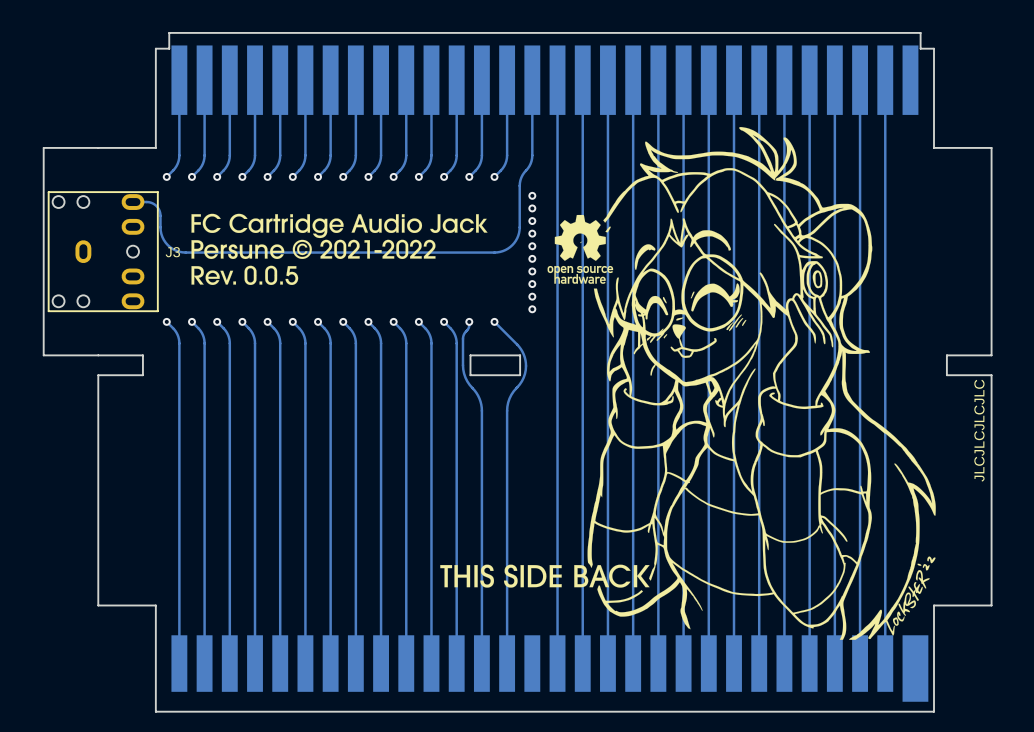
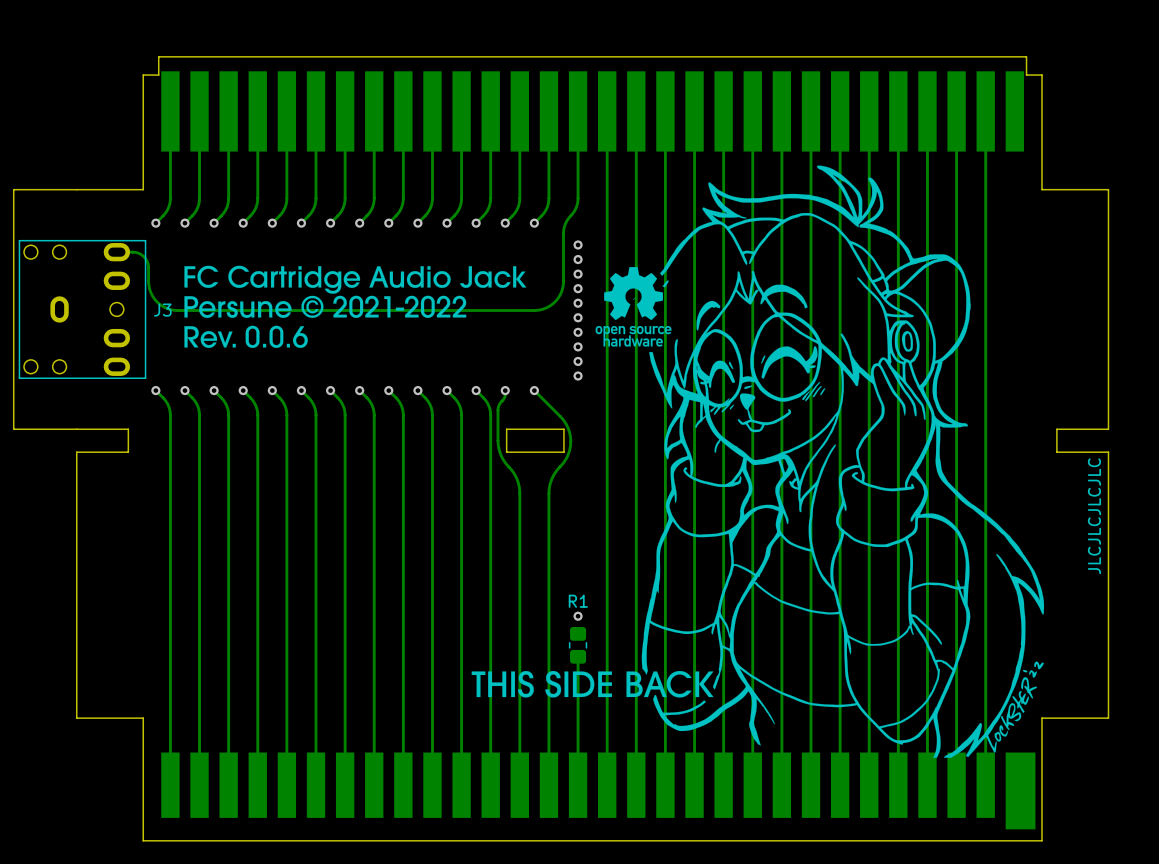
drawing shape: [191, 127, 936, 640] -> [184, 165, 1045, 758]
via: none -> (578, 616)
R1: none -> (578, 645)
track: none -> (578, 656) (578, 785)

